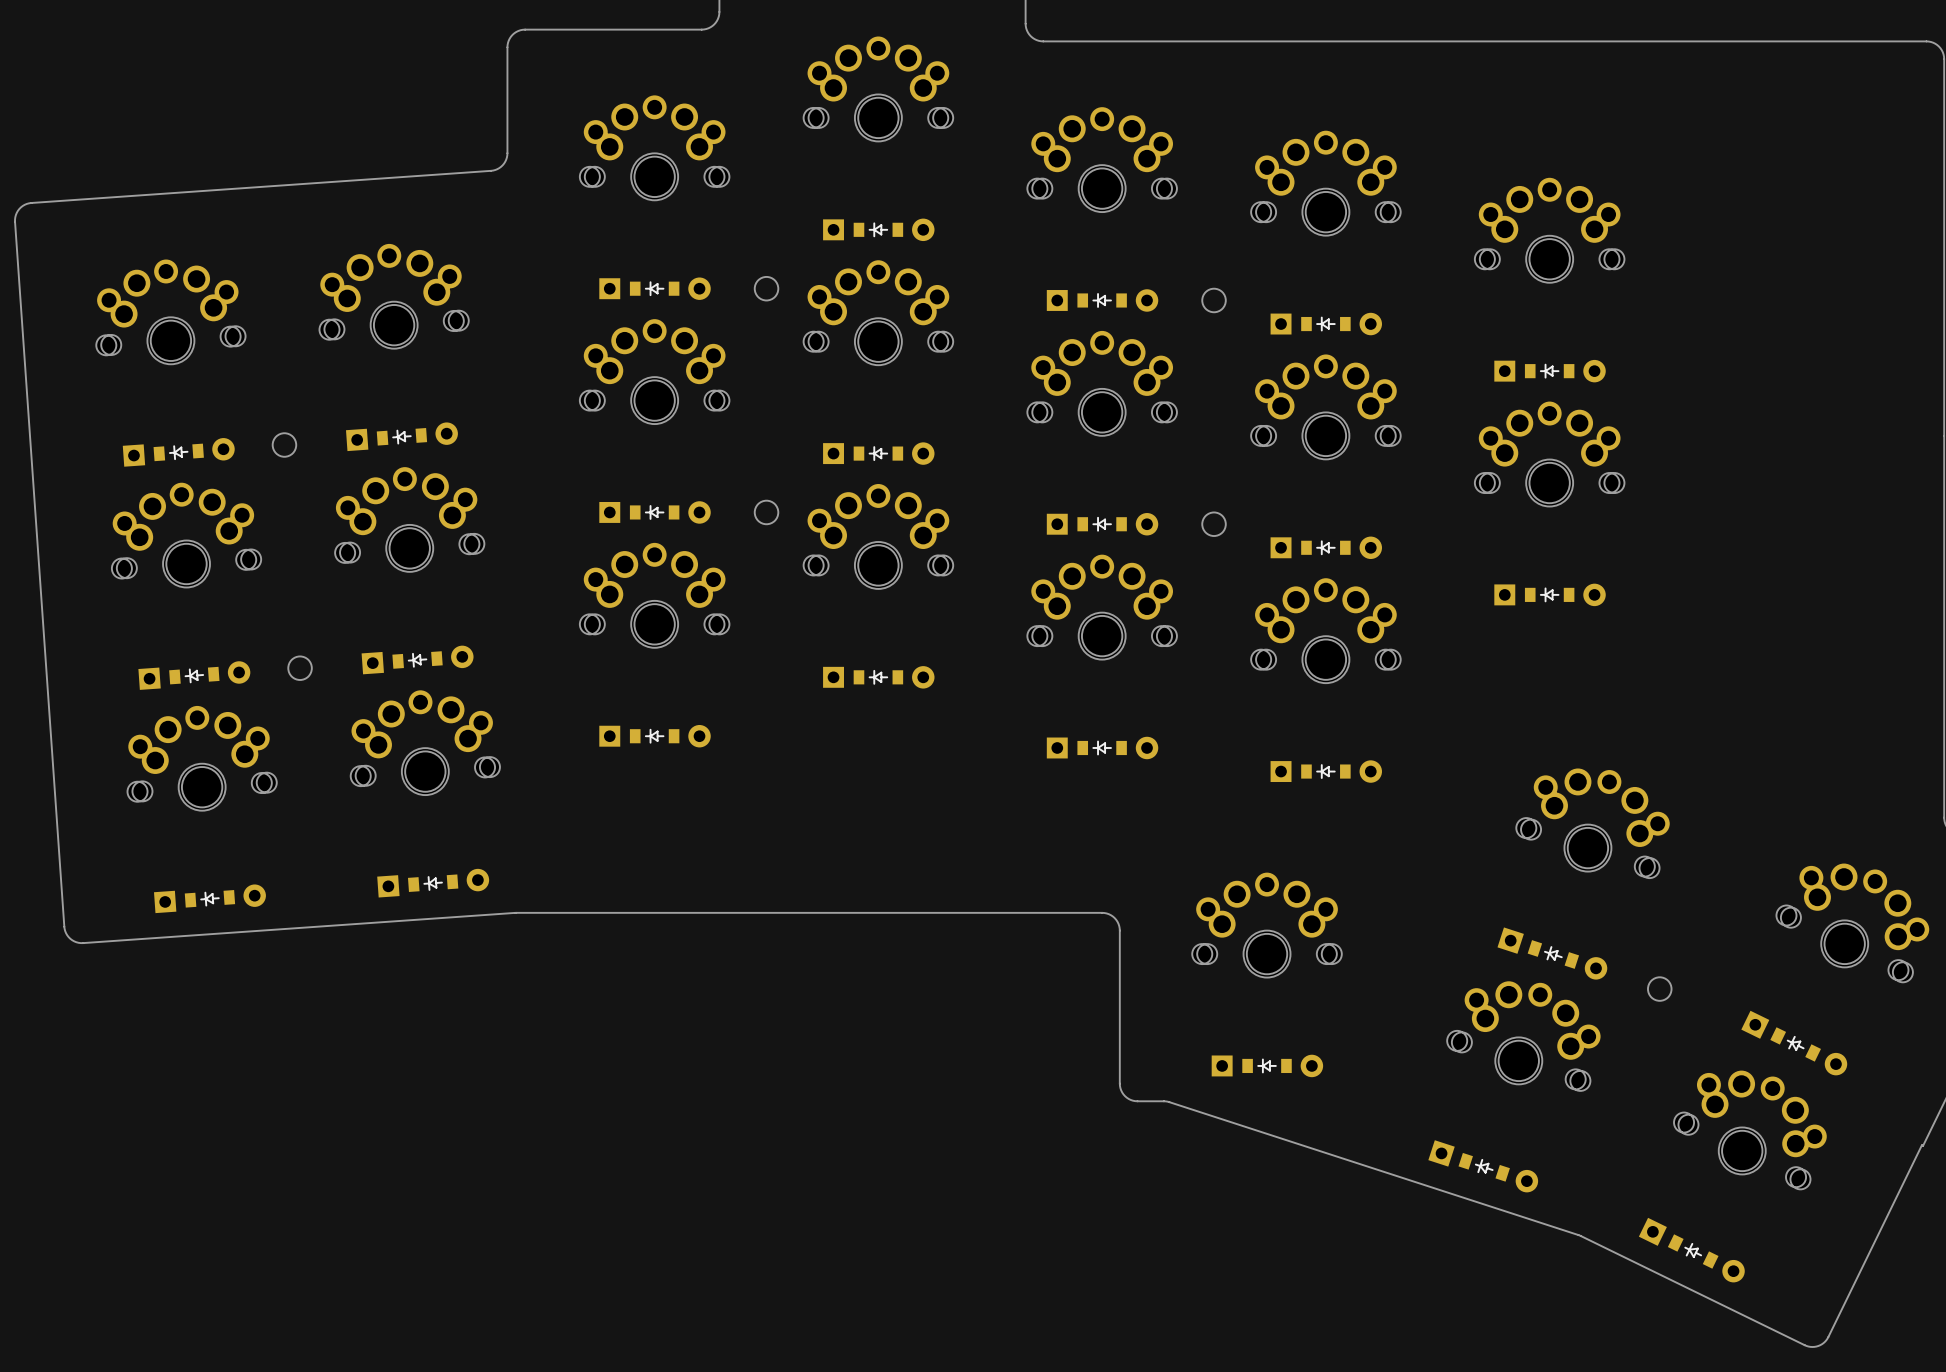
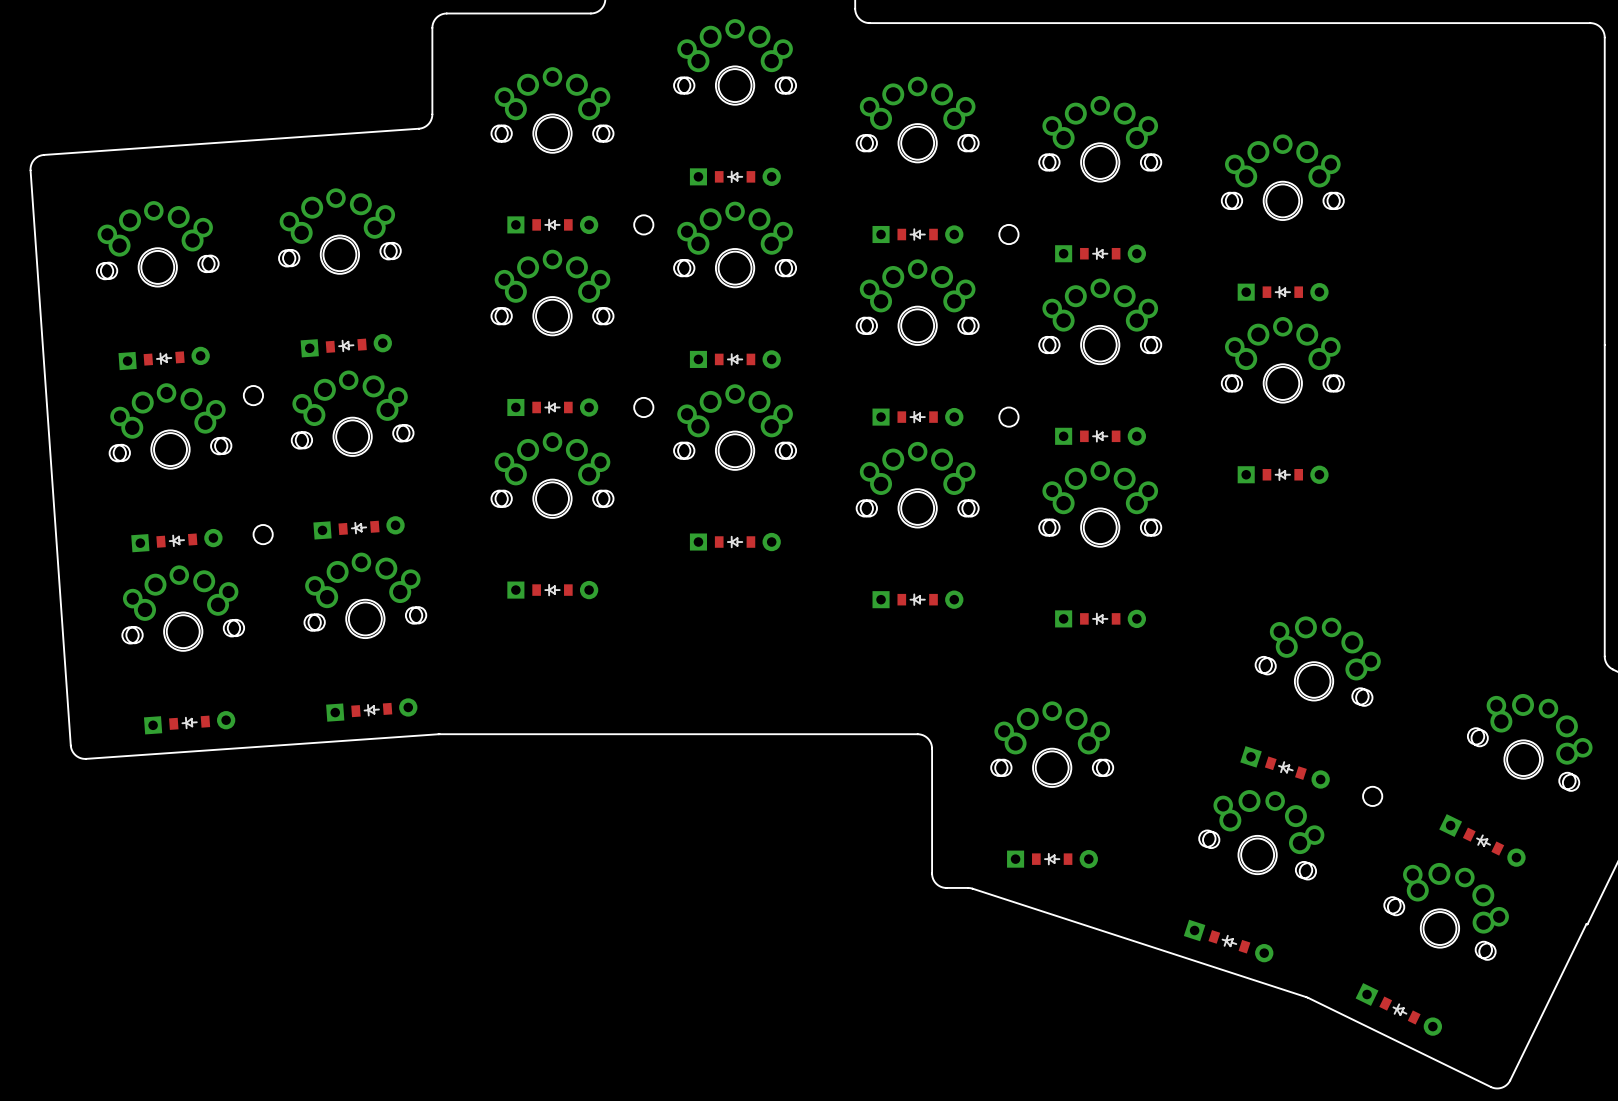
round board edge position: (284, 445) -> (253, 395)

